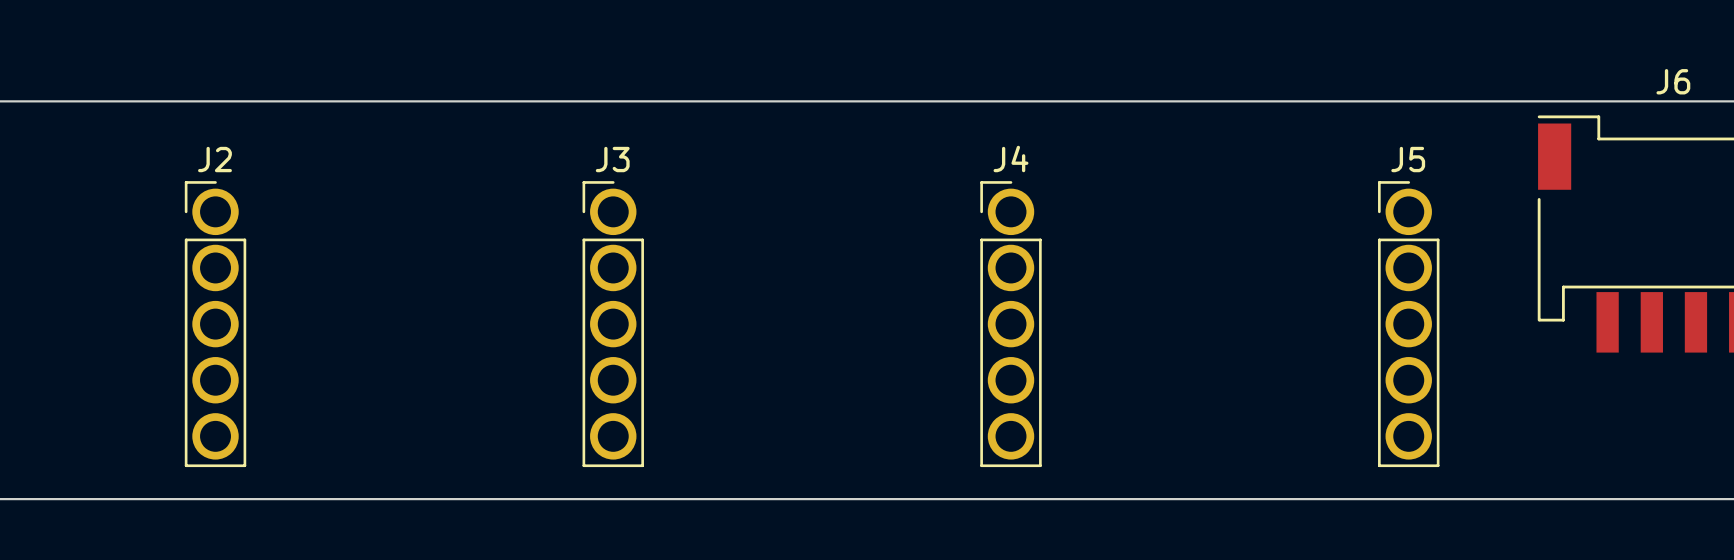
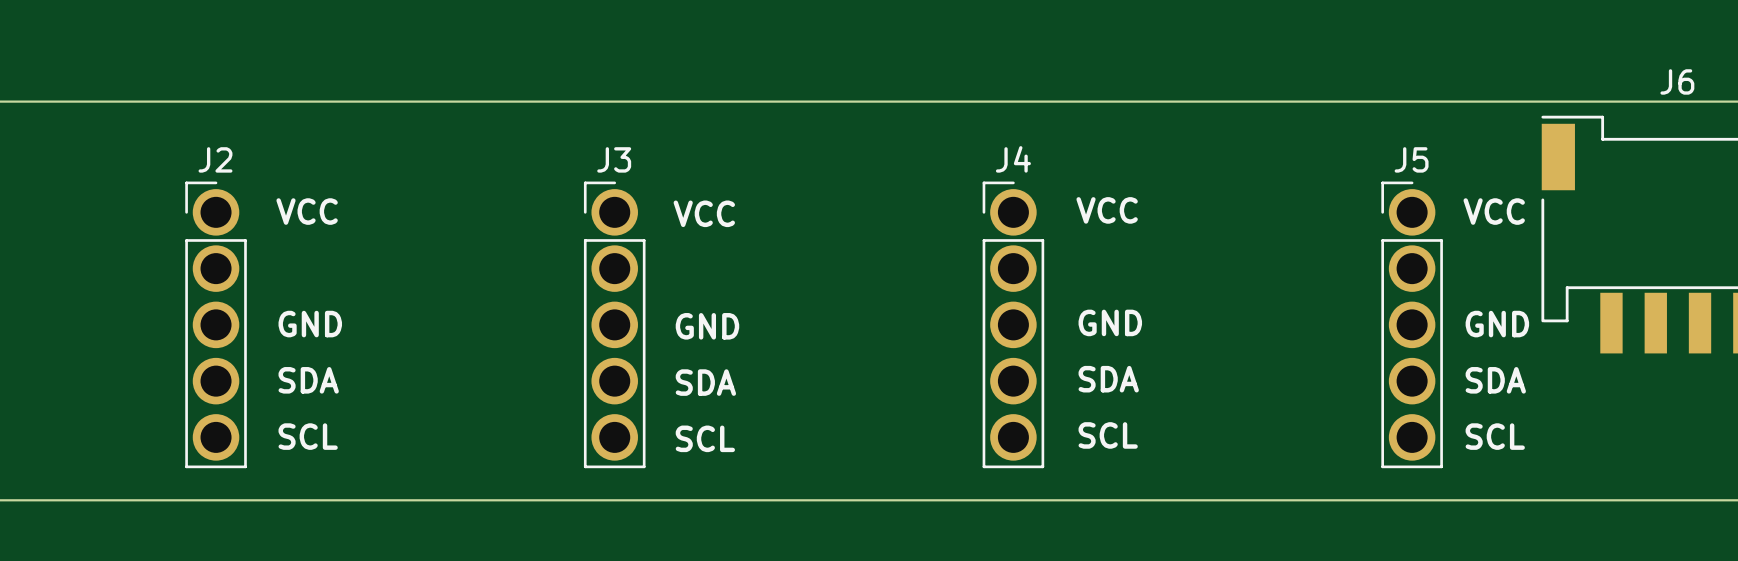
text: none -> VCC (1107, 210)
text: none -> VCC (307, 211)
text: none -> VCC (1494, 211)
text: none -> VCC (704, 213)
text: none -> GND (1110, 322)
text: none -> GND (310, 324)
text: none -> GND (1497, 324)
text: none -> GND (707, 326)
text: none -> SDA (1108, 379)
text: none -> SDA (308, 380)
text: none -> SDA (1495, 380)
text: none -> SDA (705, 382)
text: none -> SCL (1108, 435)
text: none -> SCL (308, 436)
text: none -> SCL (1495, 436)
text: none -> SCL (705, 438)

